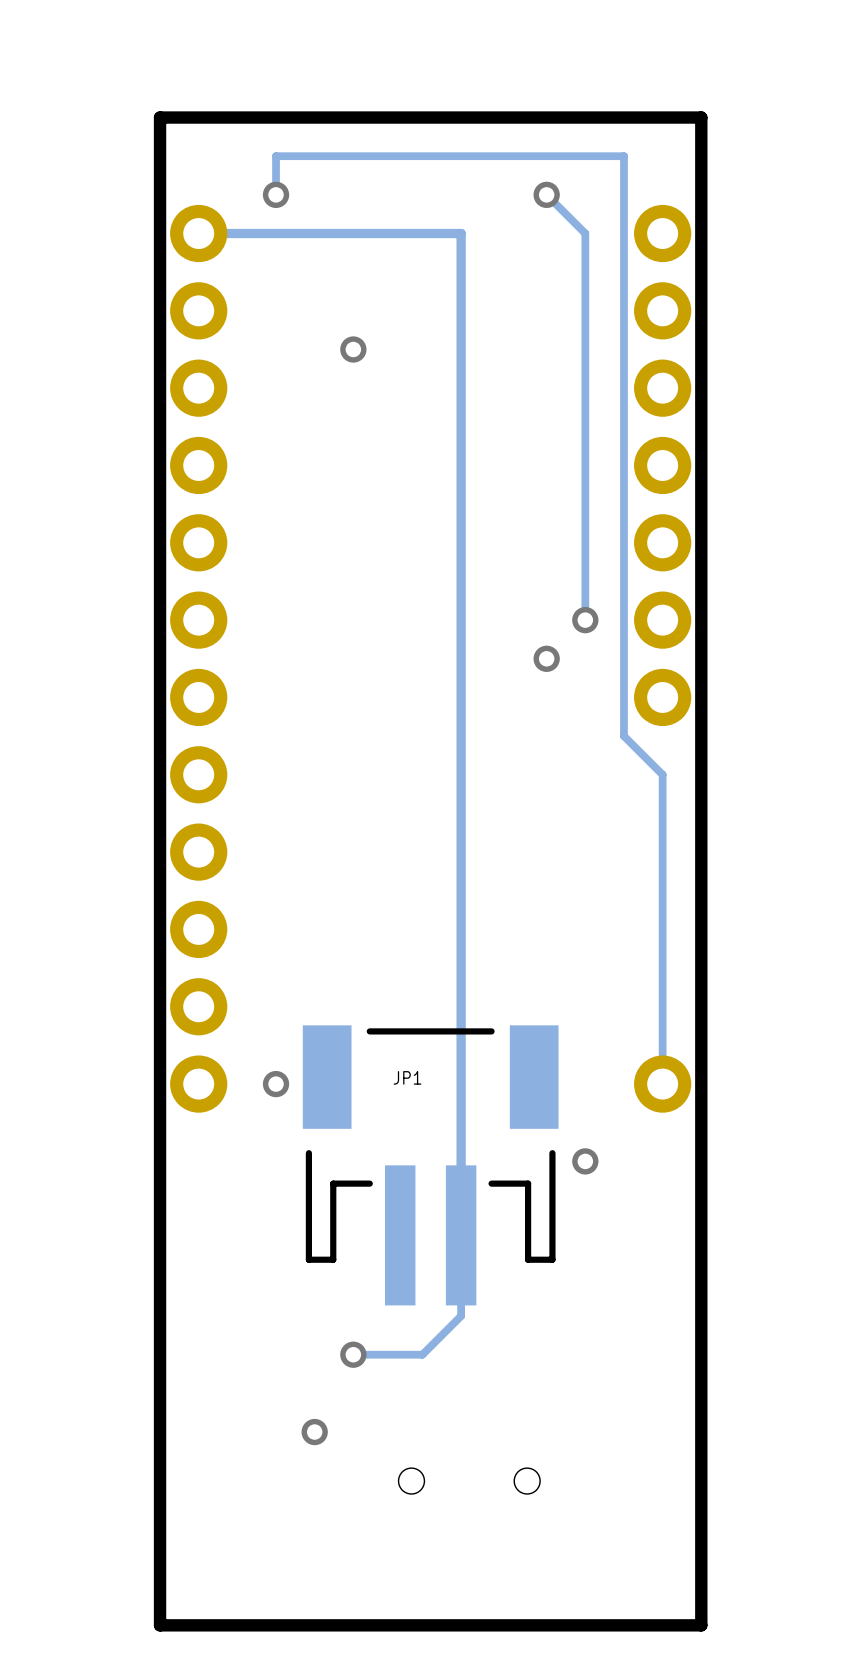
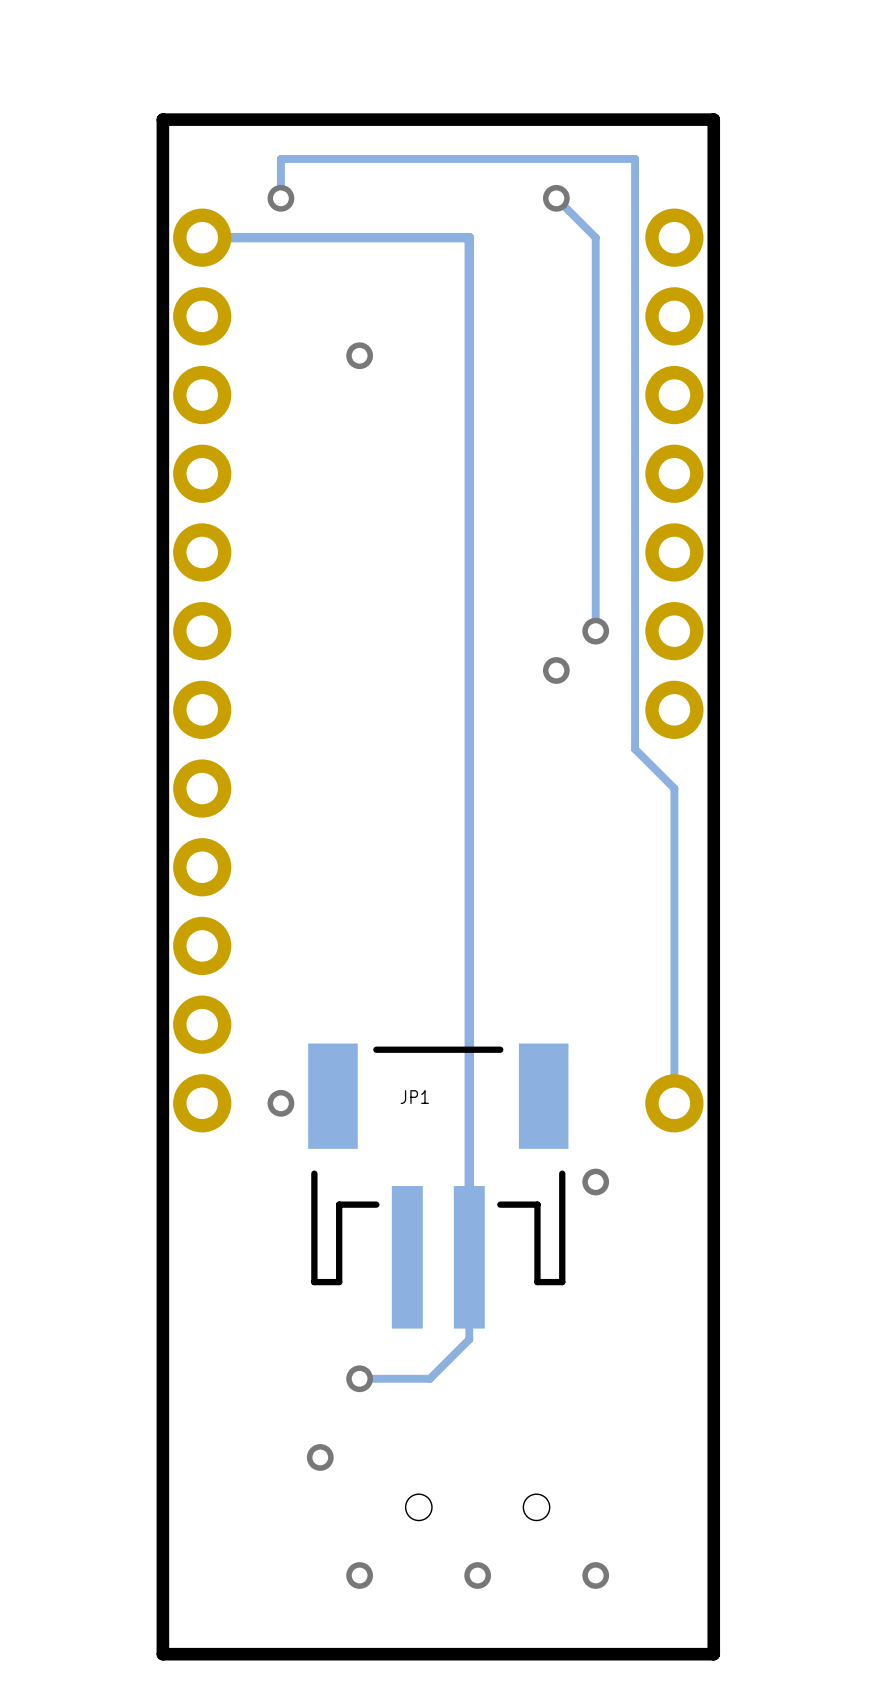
via: none -> (359, 1575)
via: none -> (477, 1575)
via: none -> (595, 1575)

